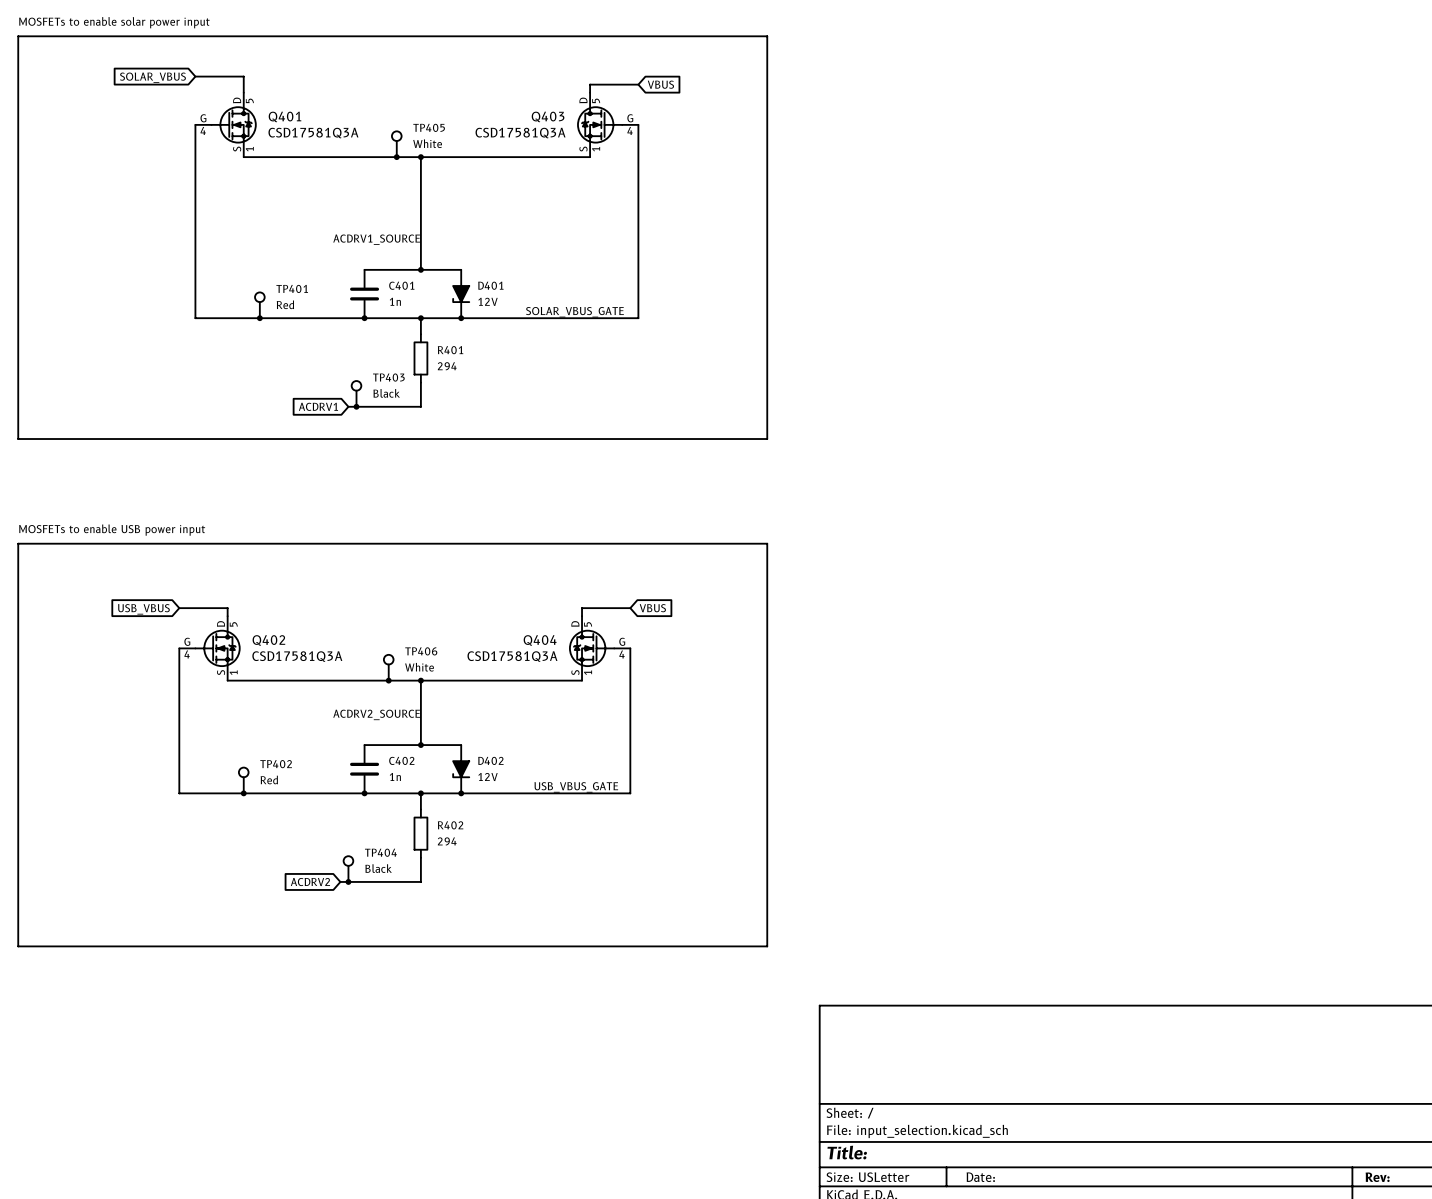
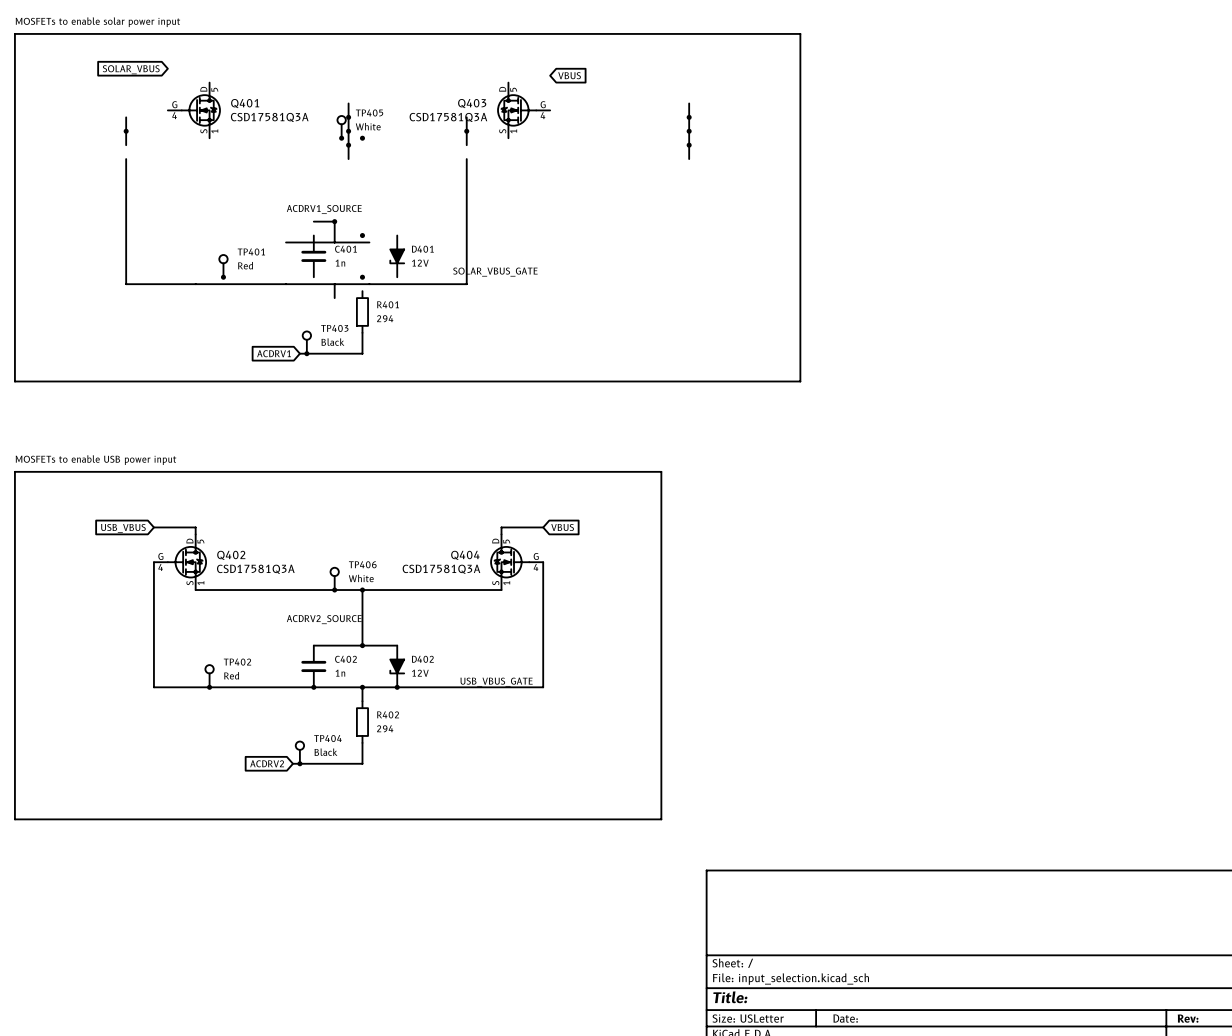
line: (767, 36) (767, 439) -> (661, 33) (800, 33) (800, 381) (661, 381)
wire: (195, 76) (243, 76) (243, 92) -> none
wire: (638, 84) (590, 84) (590, 92) -> none
wire: none -> (348, 103) (348, 159)
wire: none -> (689, 103) (689, 159)
wire: (195, 124) (195, 318) (638, 318) (638, 124) -> none
wire: none -> (126, 117) (126, 145)
junction: none -> (348, 117)
wire: none -> (466, 117) (466, 145)
junction: none -> (689, 117)
junction: none -> (126, 131)
junction: none -> (348, 131)
junction: none -> (466, 131)
junction: none -> (689, 131)
wire: (243, 157) (590, 157) -> none
wire: (420, 157) (420, 269) -> none
junction: none -> (348, 145)
junction: none -> (689, 145)
wire: none -> (126, 159) (126, 284) (466, 284) (466, 159)
wire: none -> (313, 221) (334, 221) (334, 242)
junction: none -> (334, 221)
wire: (364, 269) (461, 269) -> (286, 242) (369, 242)
junction: (364, 318) -> none
wire: (420, 318) (420, 334) -> (334, 284) (334, 298)
junction: (461, 318) -> none

